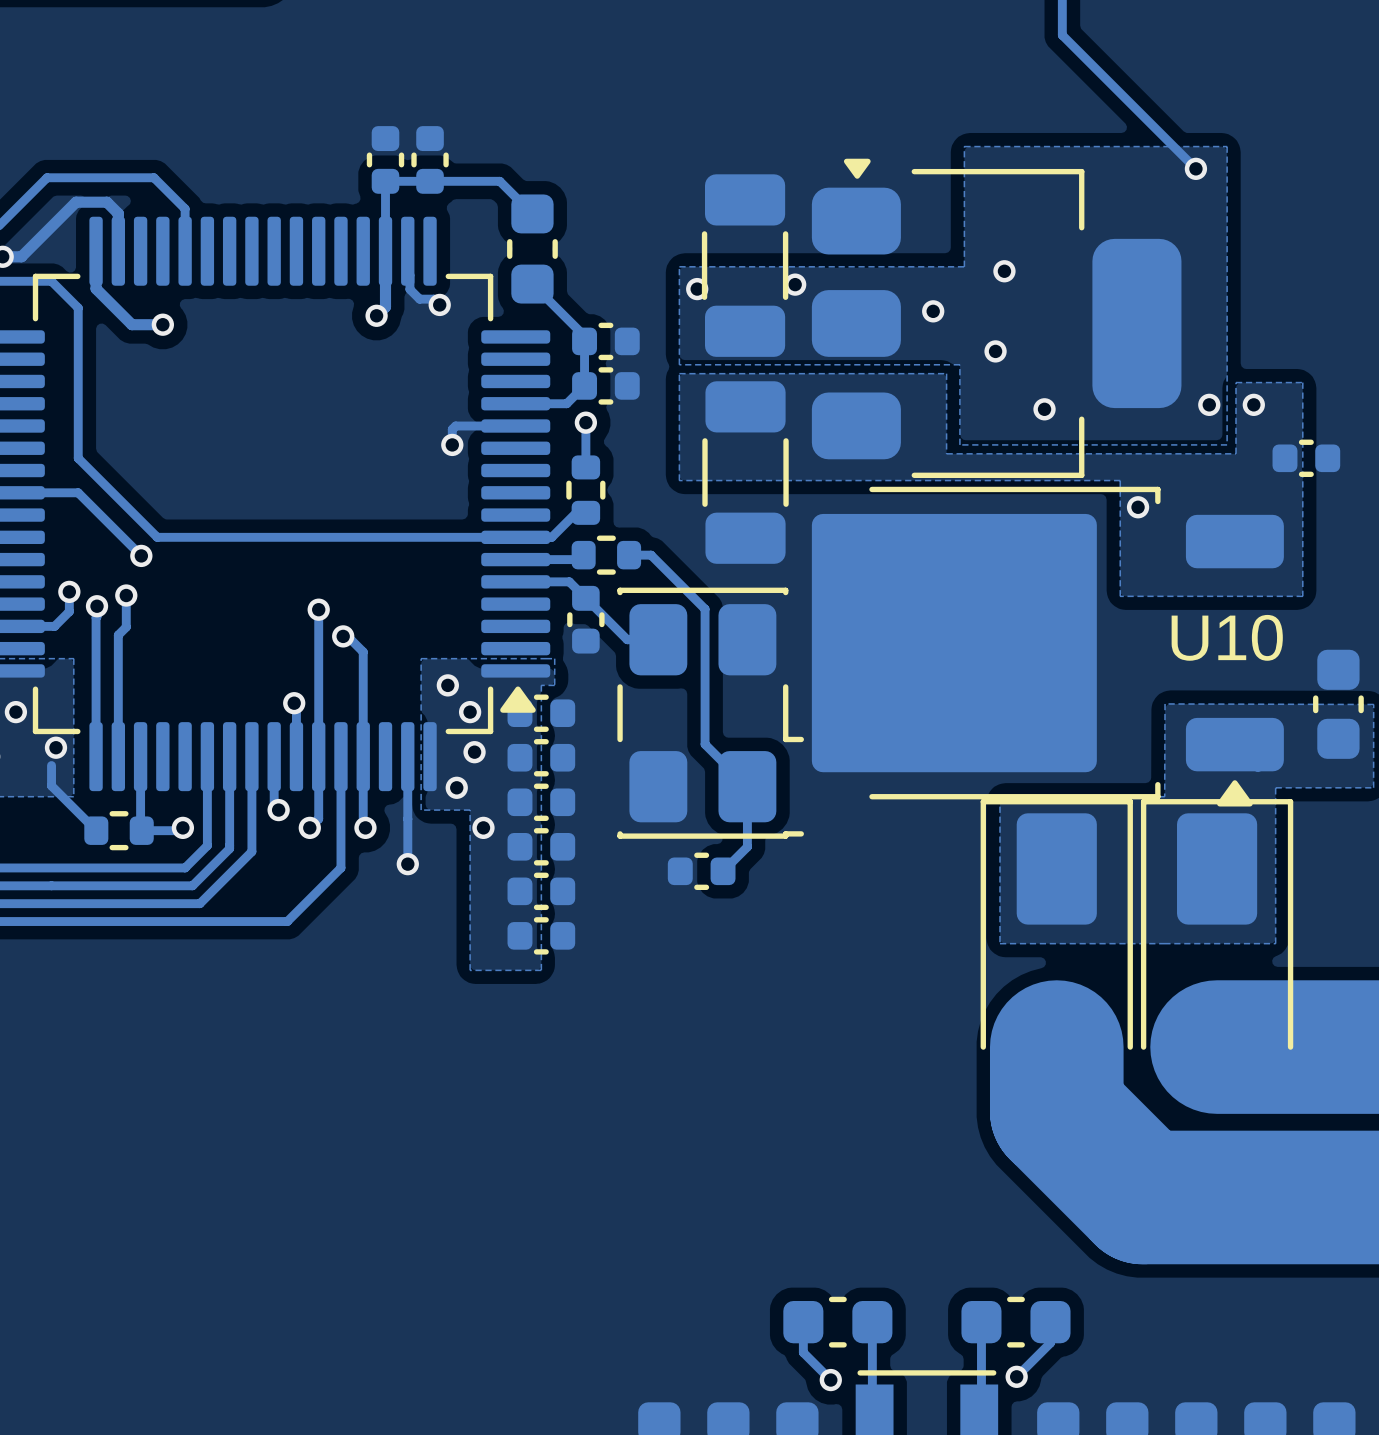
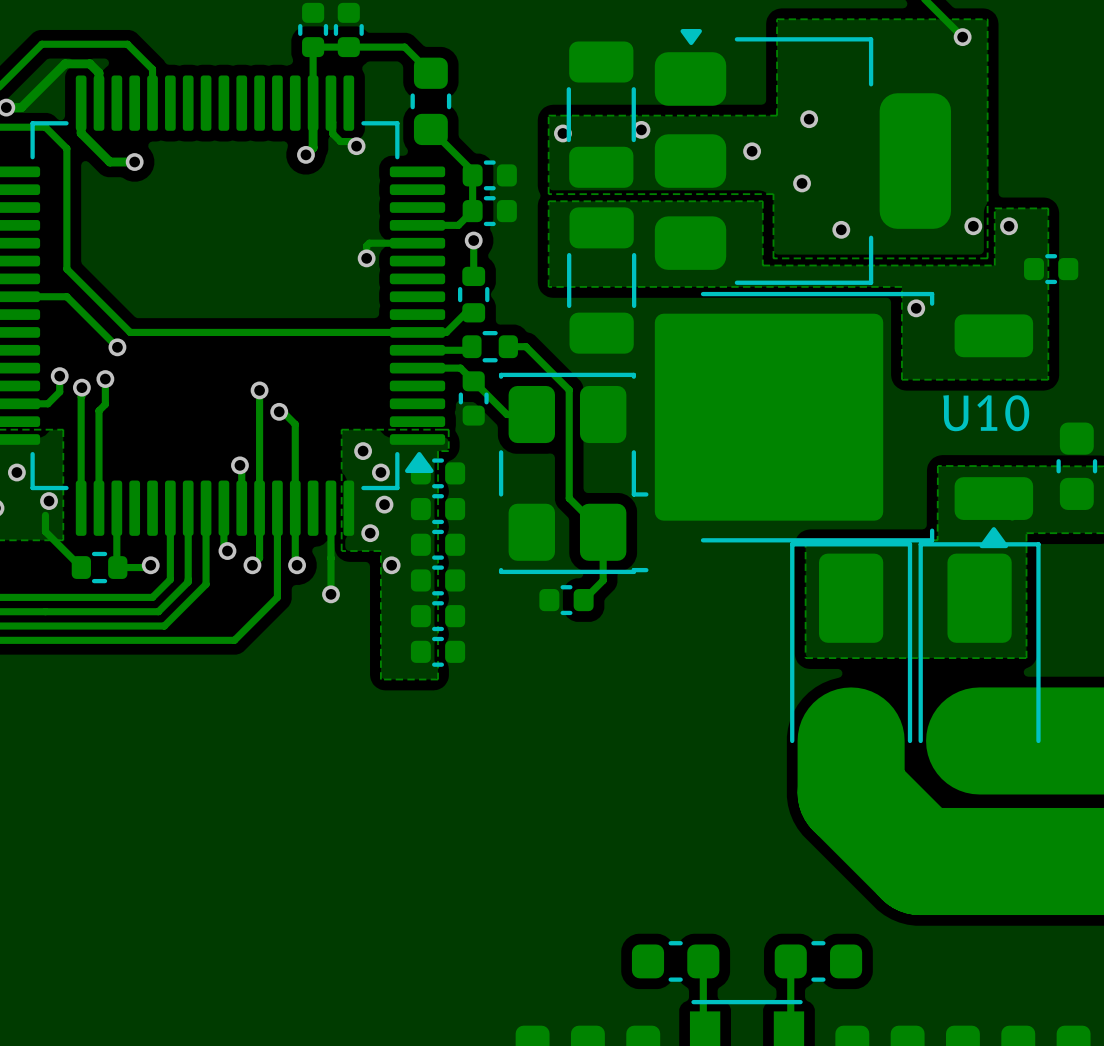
track: (803, 1322) (803, 1352) (830, 1380) -> none
track: (1050, 1322) (1050, 1343) (1016, 1376) -> none
via: (1016, 1376) -> none
via: (830, 1380) -> none

